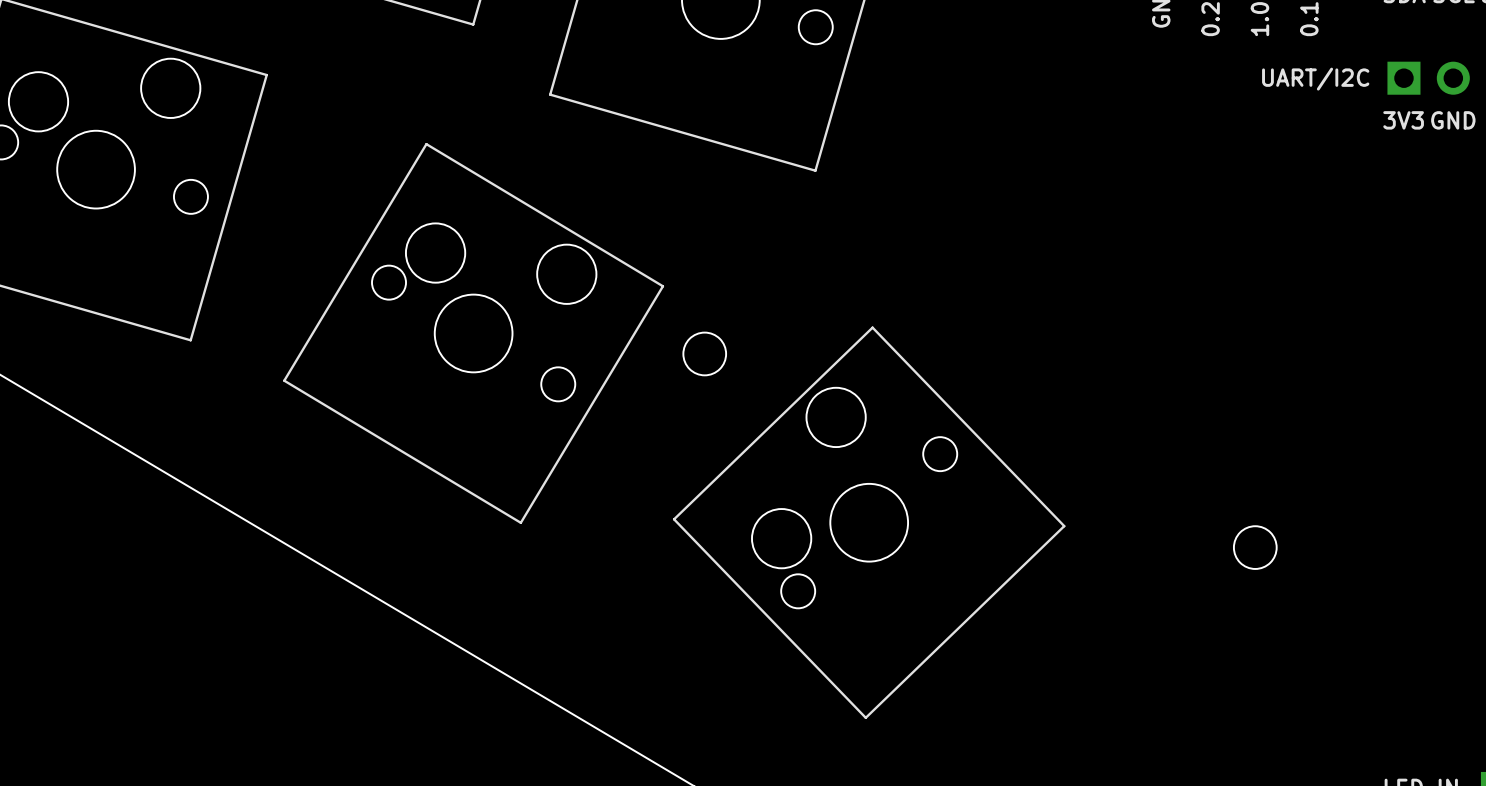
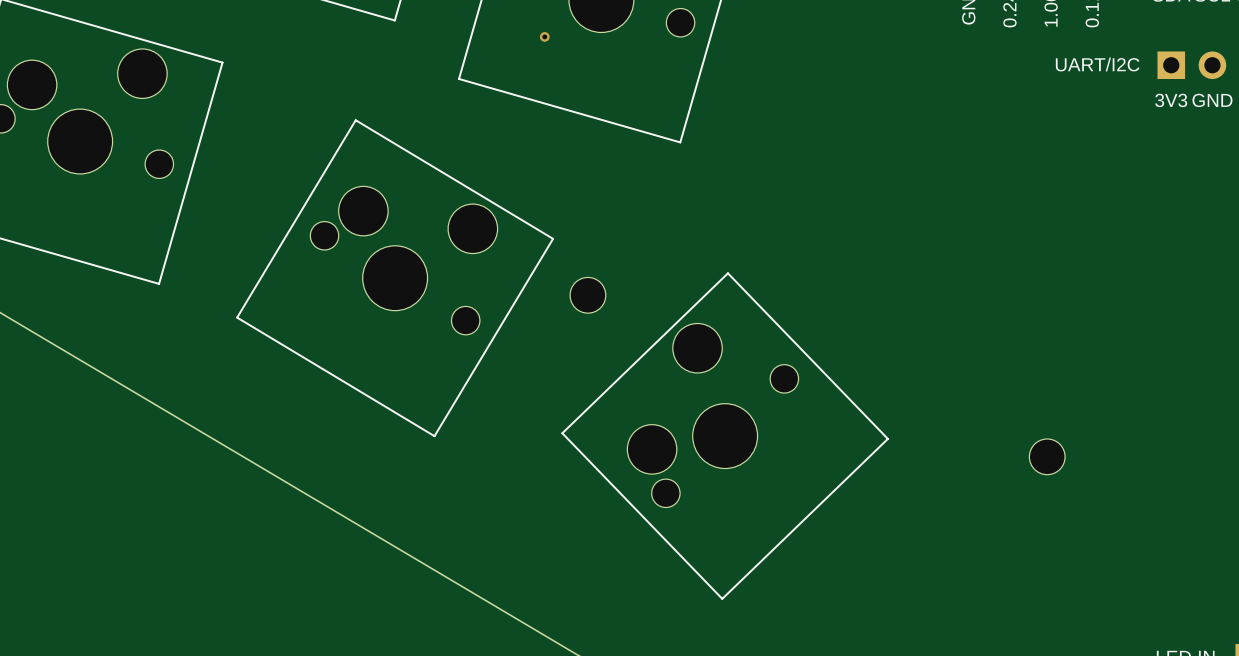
via: none -> (544, 36)

